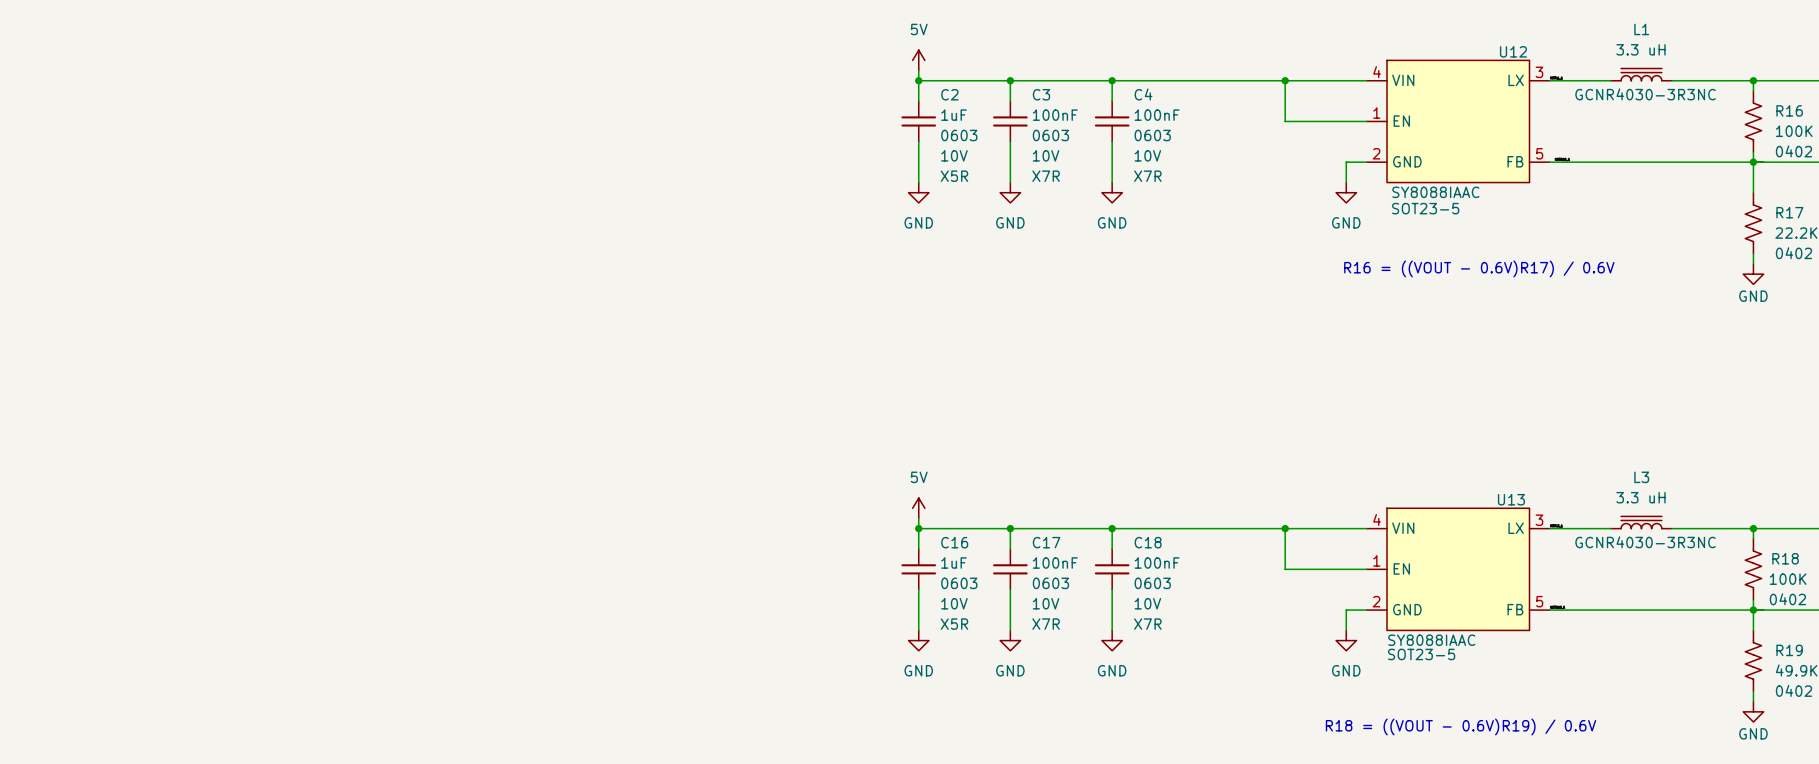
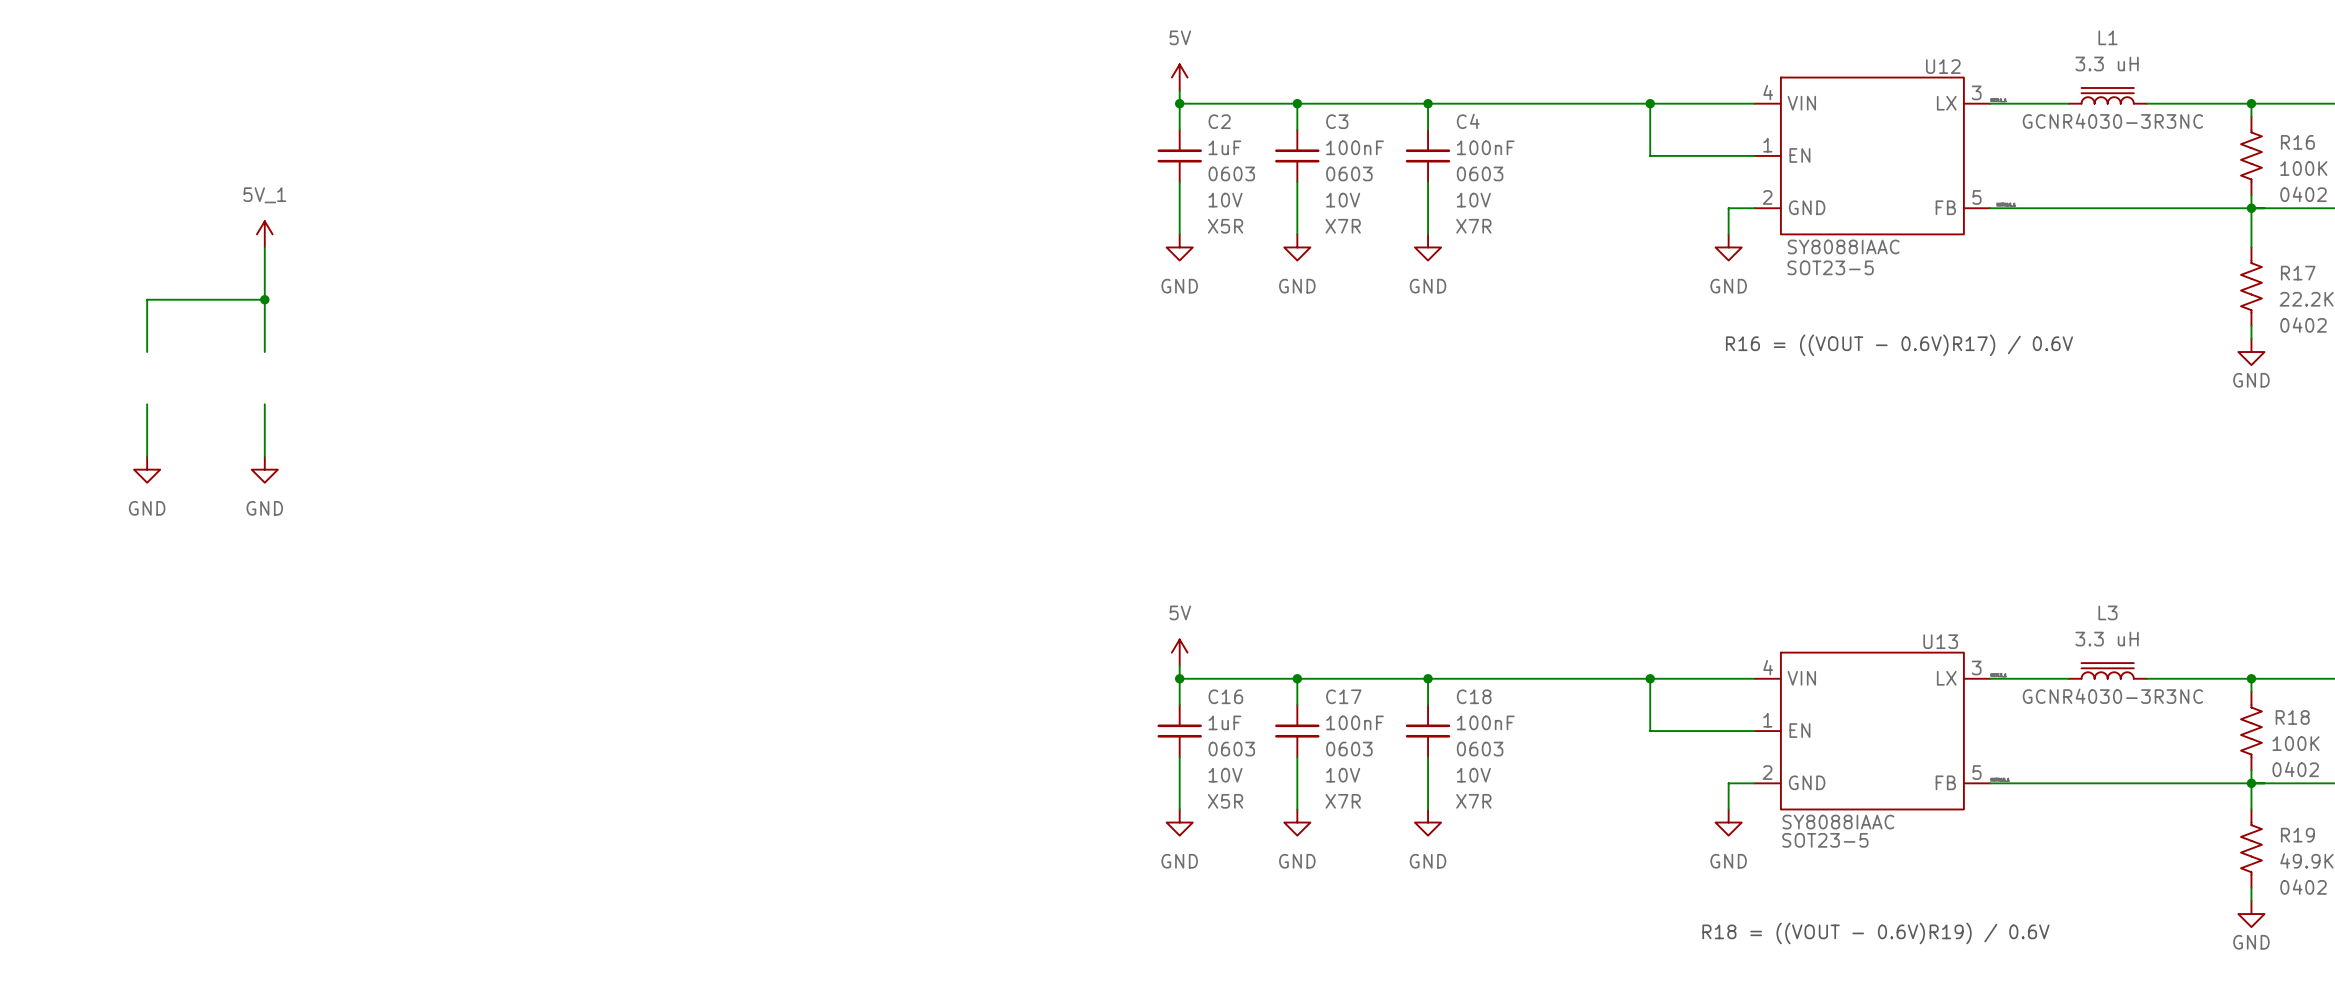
power symbol: none -> 5V_1 (264, 234)
wire: none -> (264, 247) (264, 352)
wire: none -> (264, 299) (147, 299) (147, 352)
junction: none -> (264, 299)
wire: none -> (147, 404) (147, 456)
wire: none -> (264, 404) (264, 456)
power symbol: none -> GND (147, 469)
power symbol: none -> GND (264, 469)

